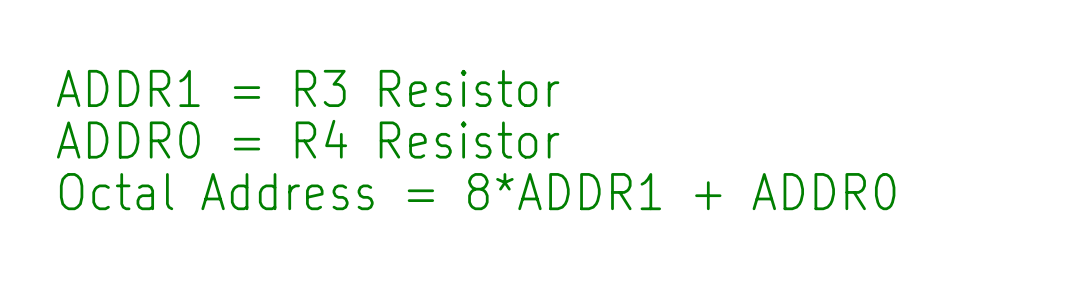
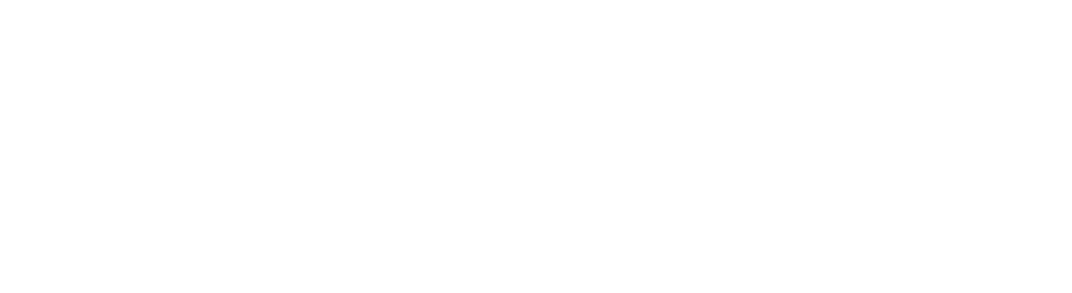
text: ADDR1 = R3 Resistor (308, 88) -> none
text: ADDR0 = R4 Resistor (308, 139) -> none
text: Octal Address = 8*ADDR1 + ADDR0 (477, 191) -> none

